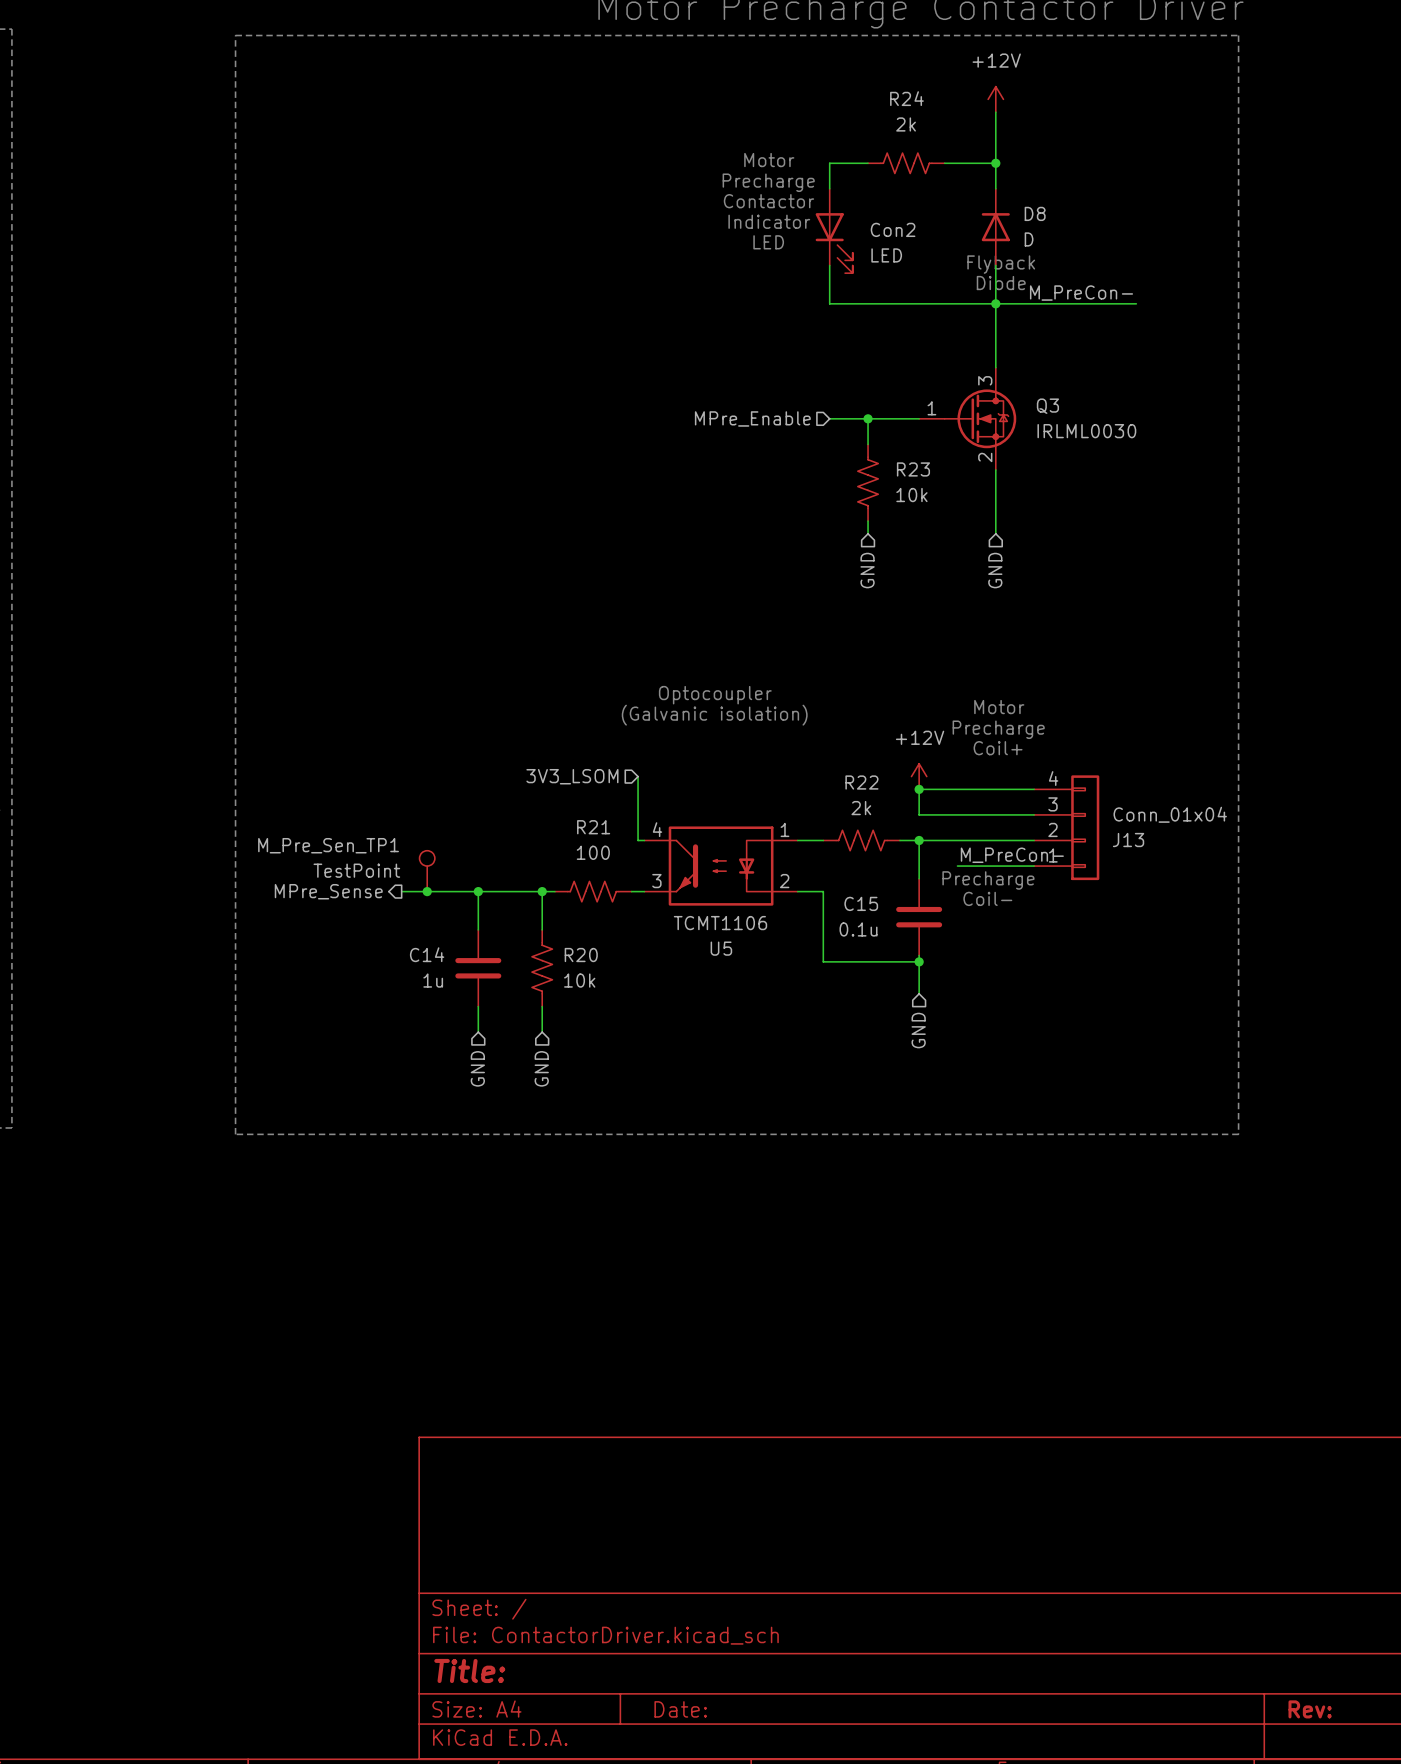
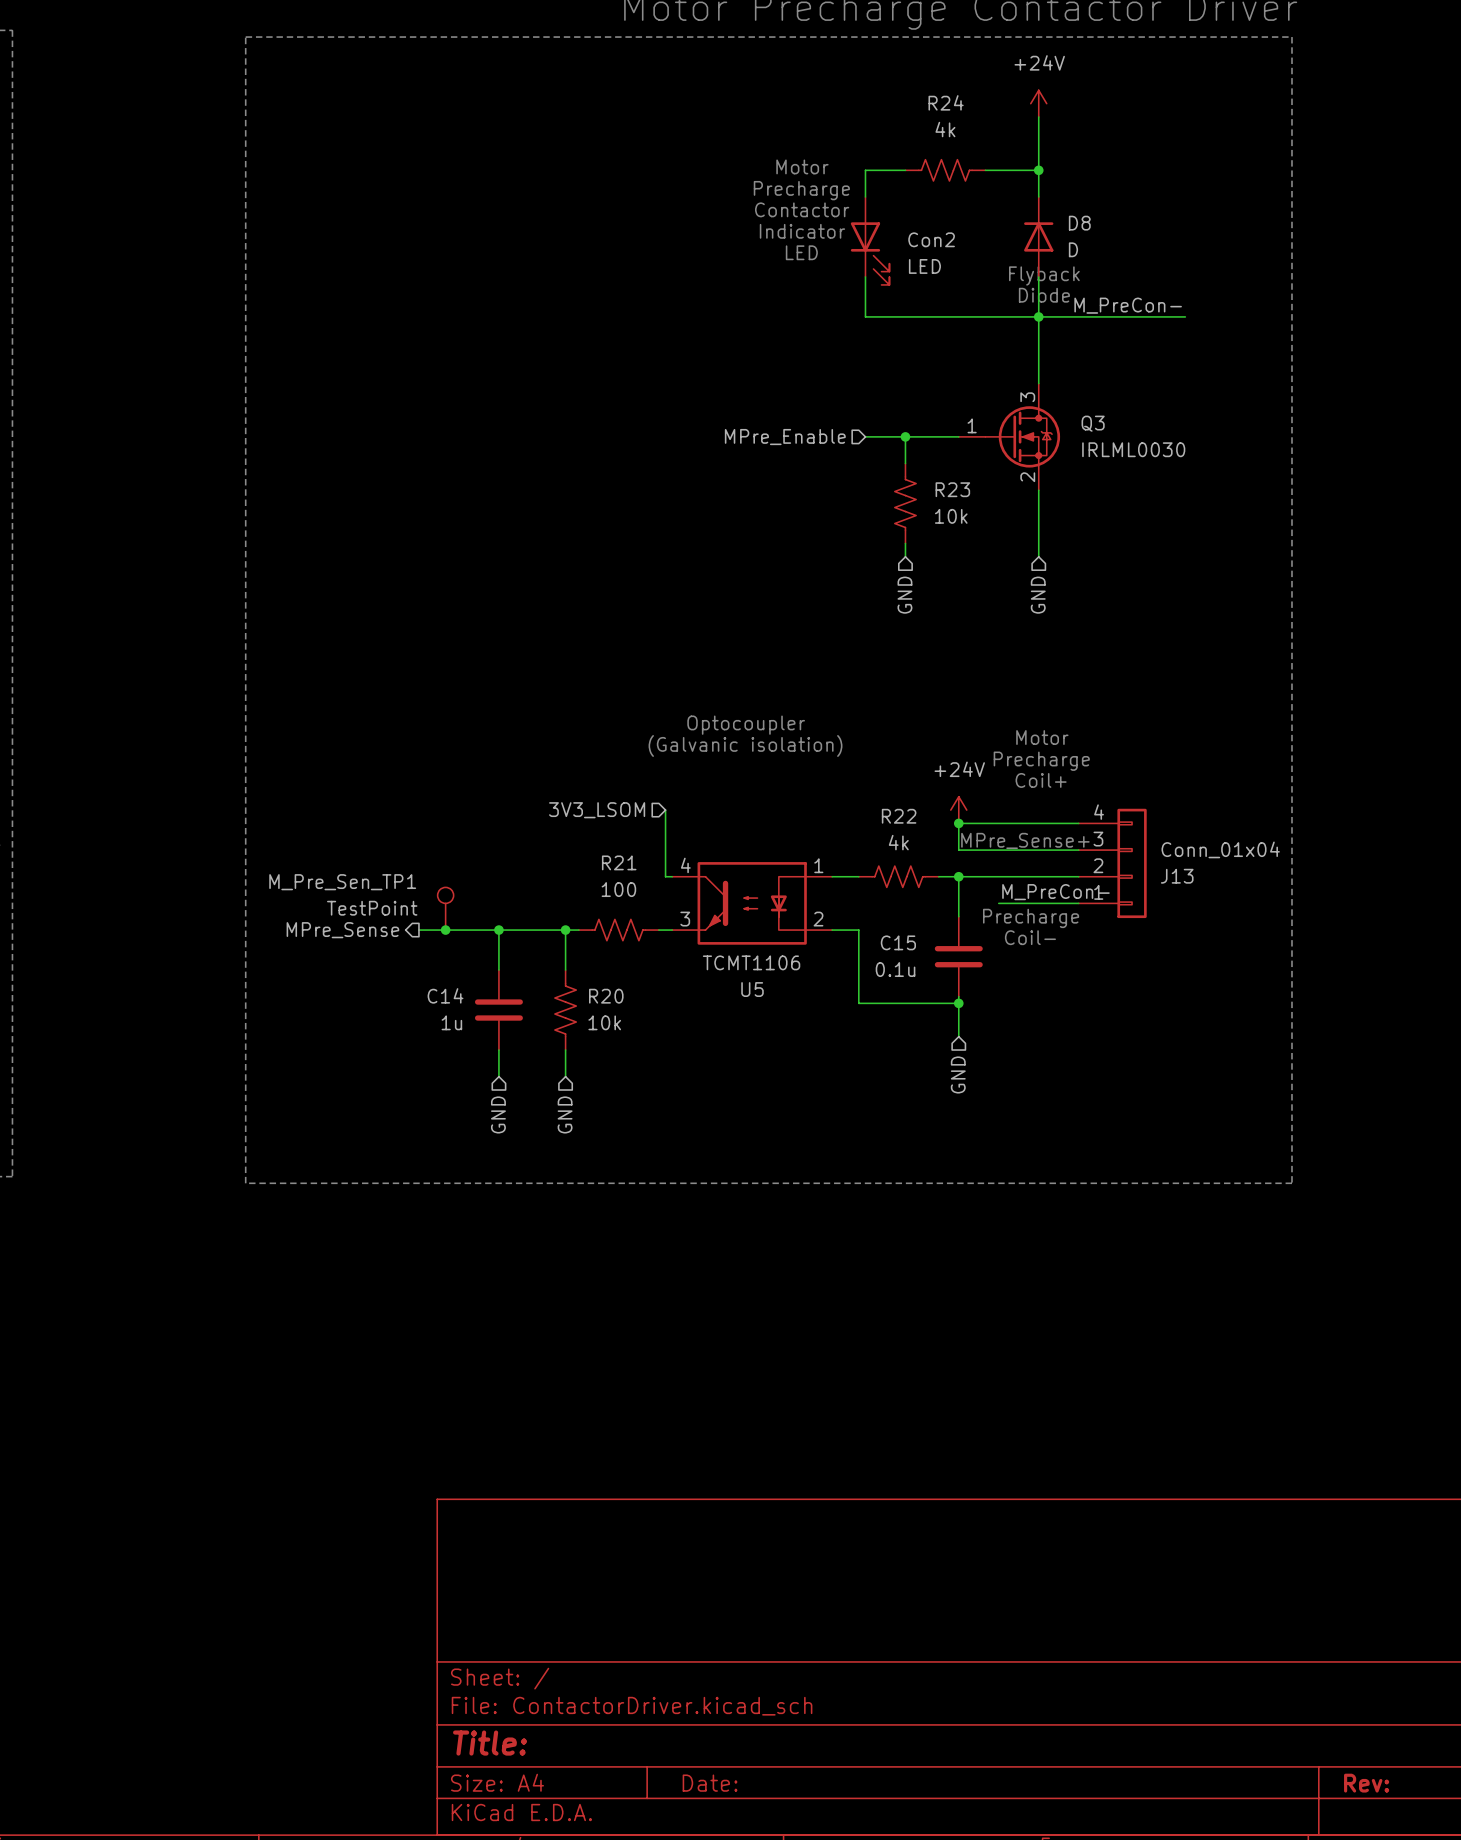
power symbol: +12V (995, 99) -> +24V (1038, 103)
R24 value: 2k (906, 124) -> 4k (945, 129)
power symbol: +12V (919, 776) -> +24V (958, 810)
text: none -> MPre_Sense+ (1025, 840)
R22 value: 2k (861, 808) -> 4k (898, 842)

